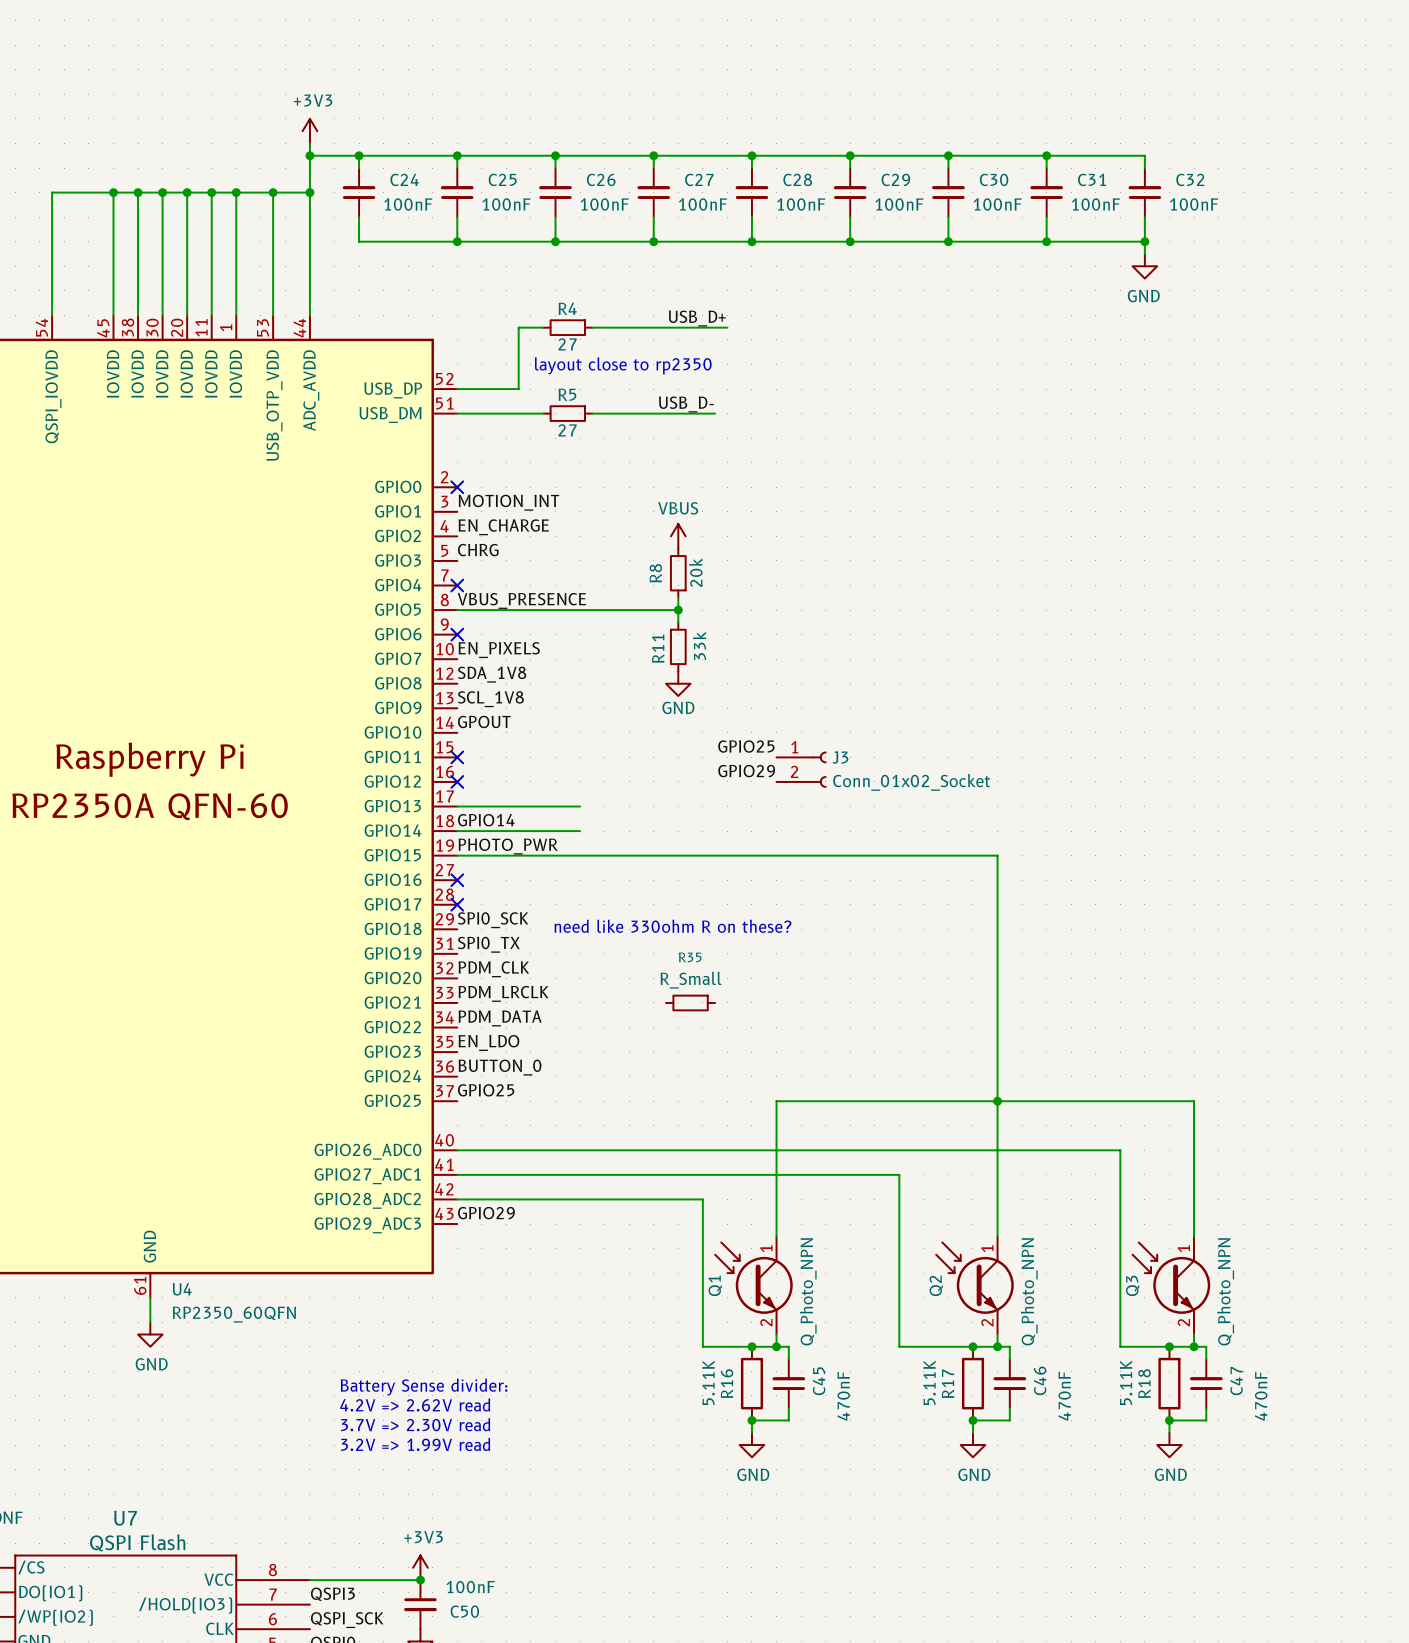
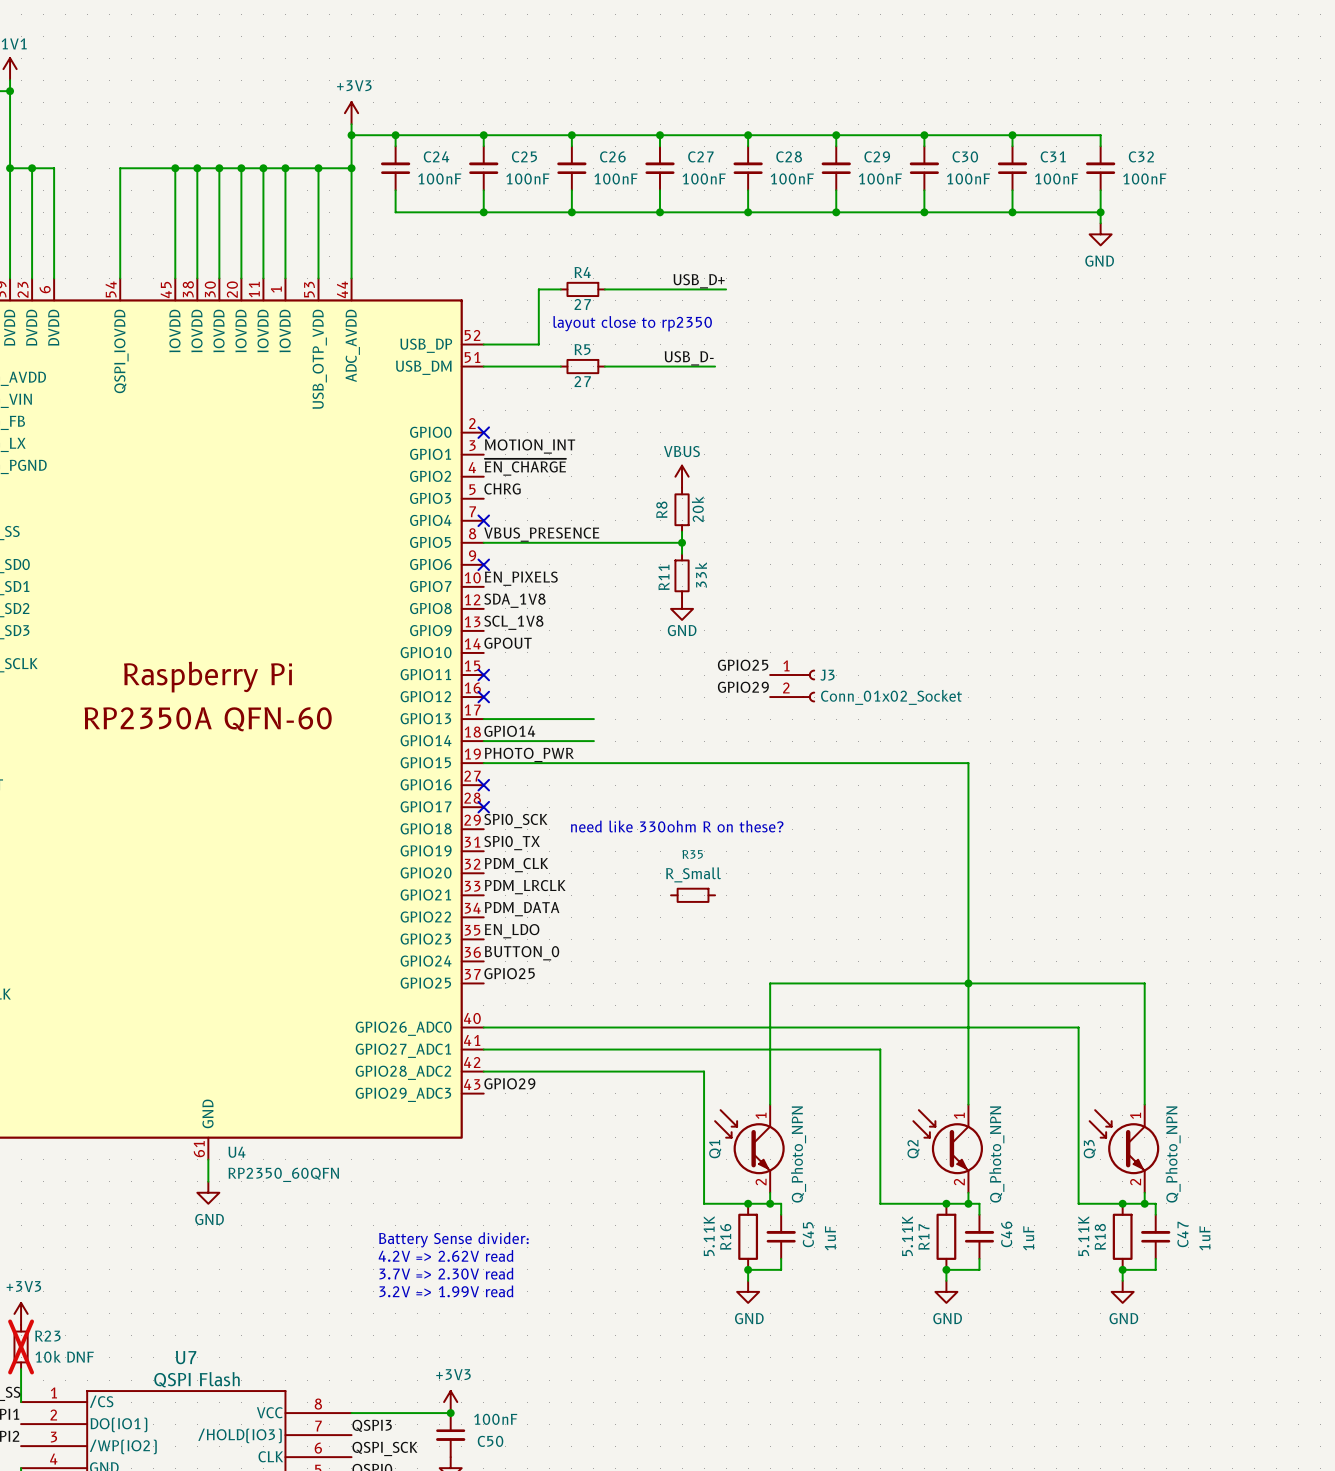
label: EN_CHARGE (503, 527) -> ~{EN_CHARGE} (525, 467)
C45 value: 470nF (843, 1396) -> 1uF (830, 1238)
C46 value: 470nF (1064, 1396) -> 1uF (1028, 1238)
C47 value: 470nF (1261, 1396) -> 1uF (1204, 1238)

